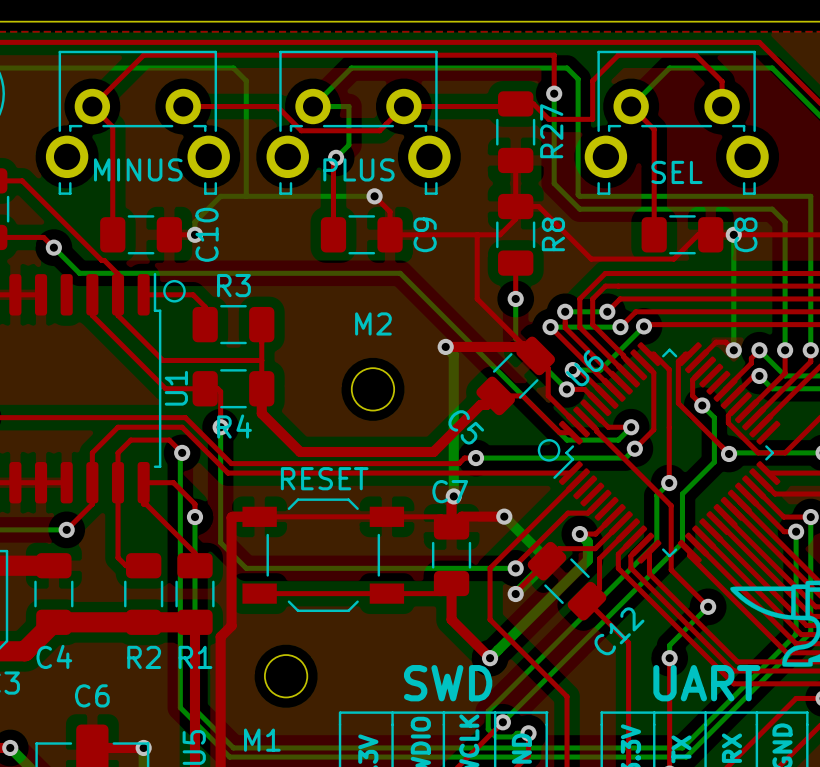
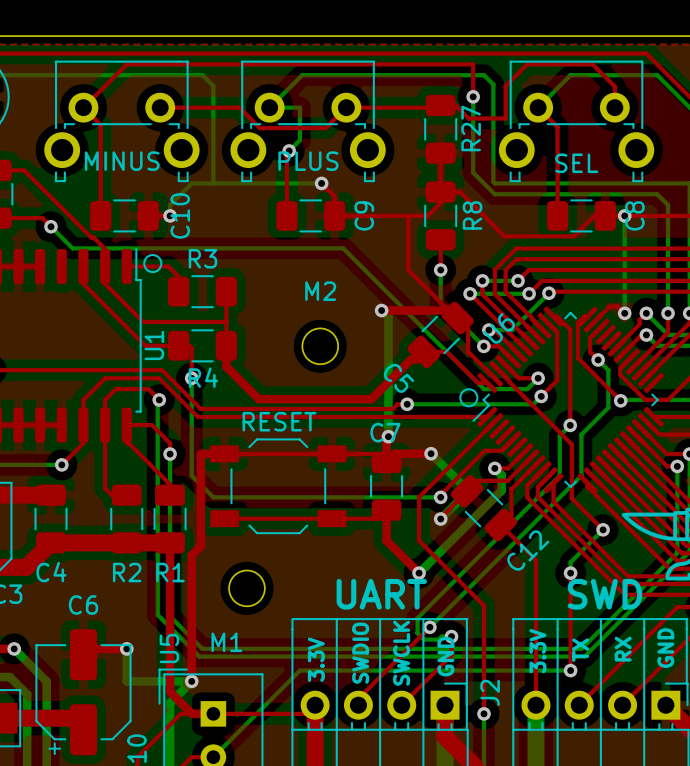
text: SWD (448, 683) -> UART (381, 594)
text: UART (706, 683) -> SWD (604, 594)

